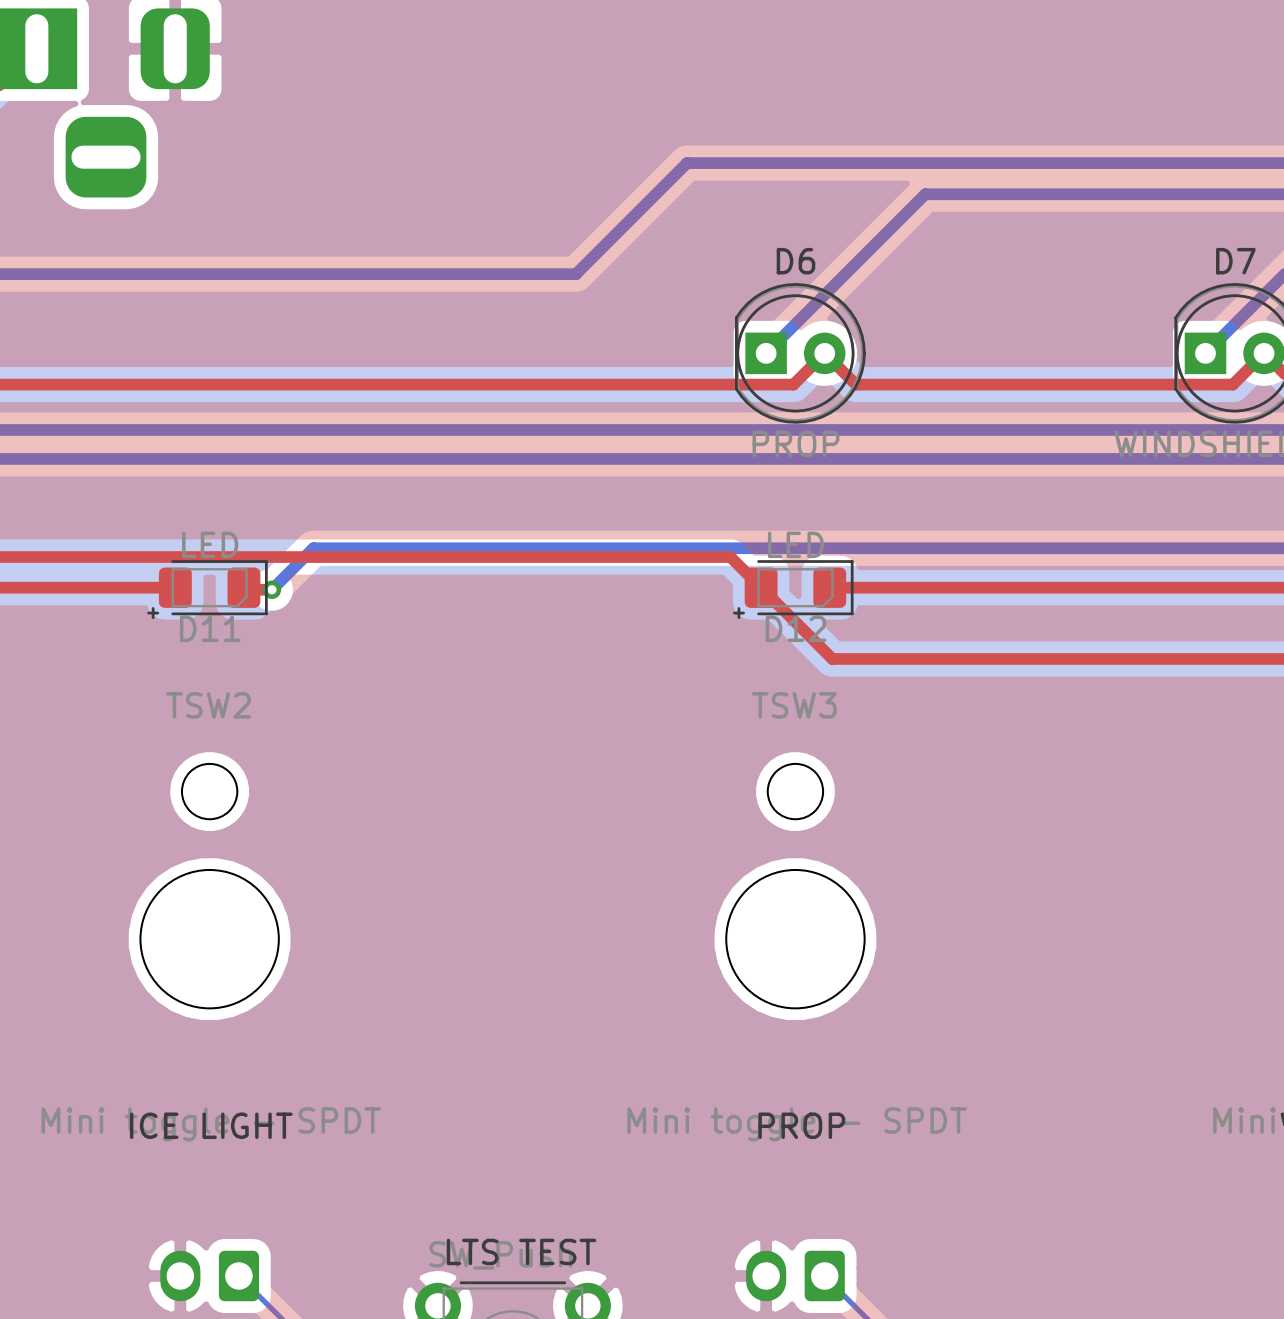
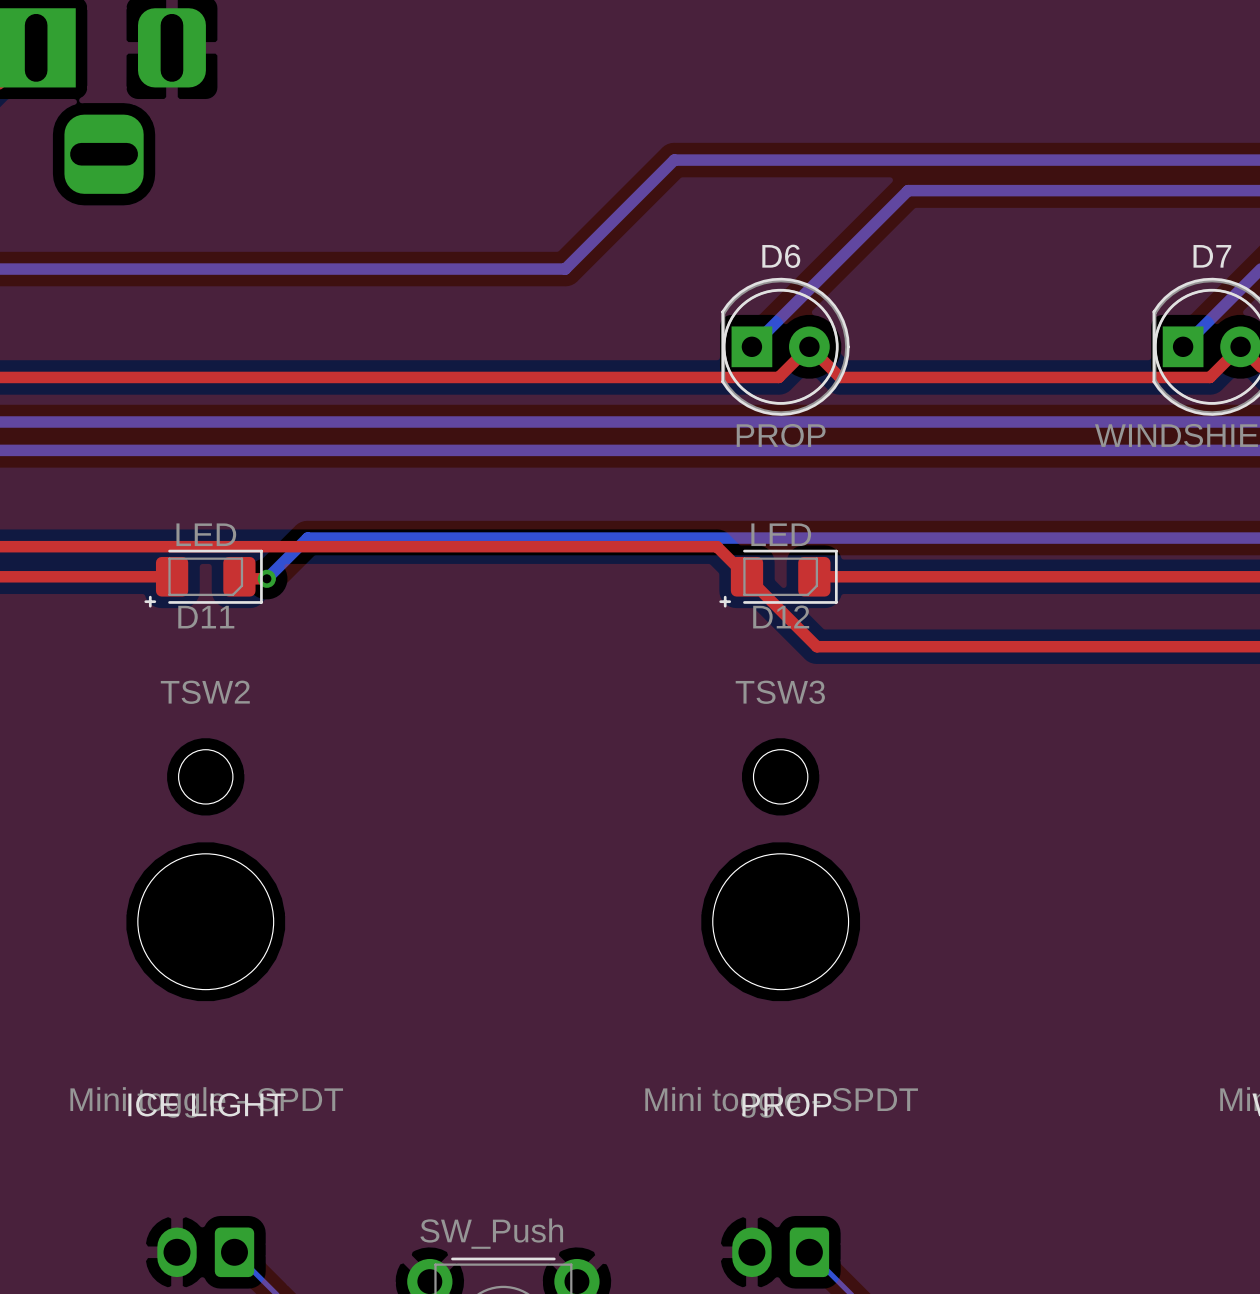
text: LTS TEST (521, 1251) -> none

